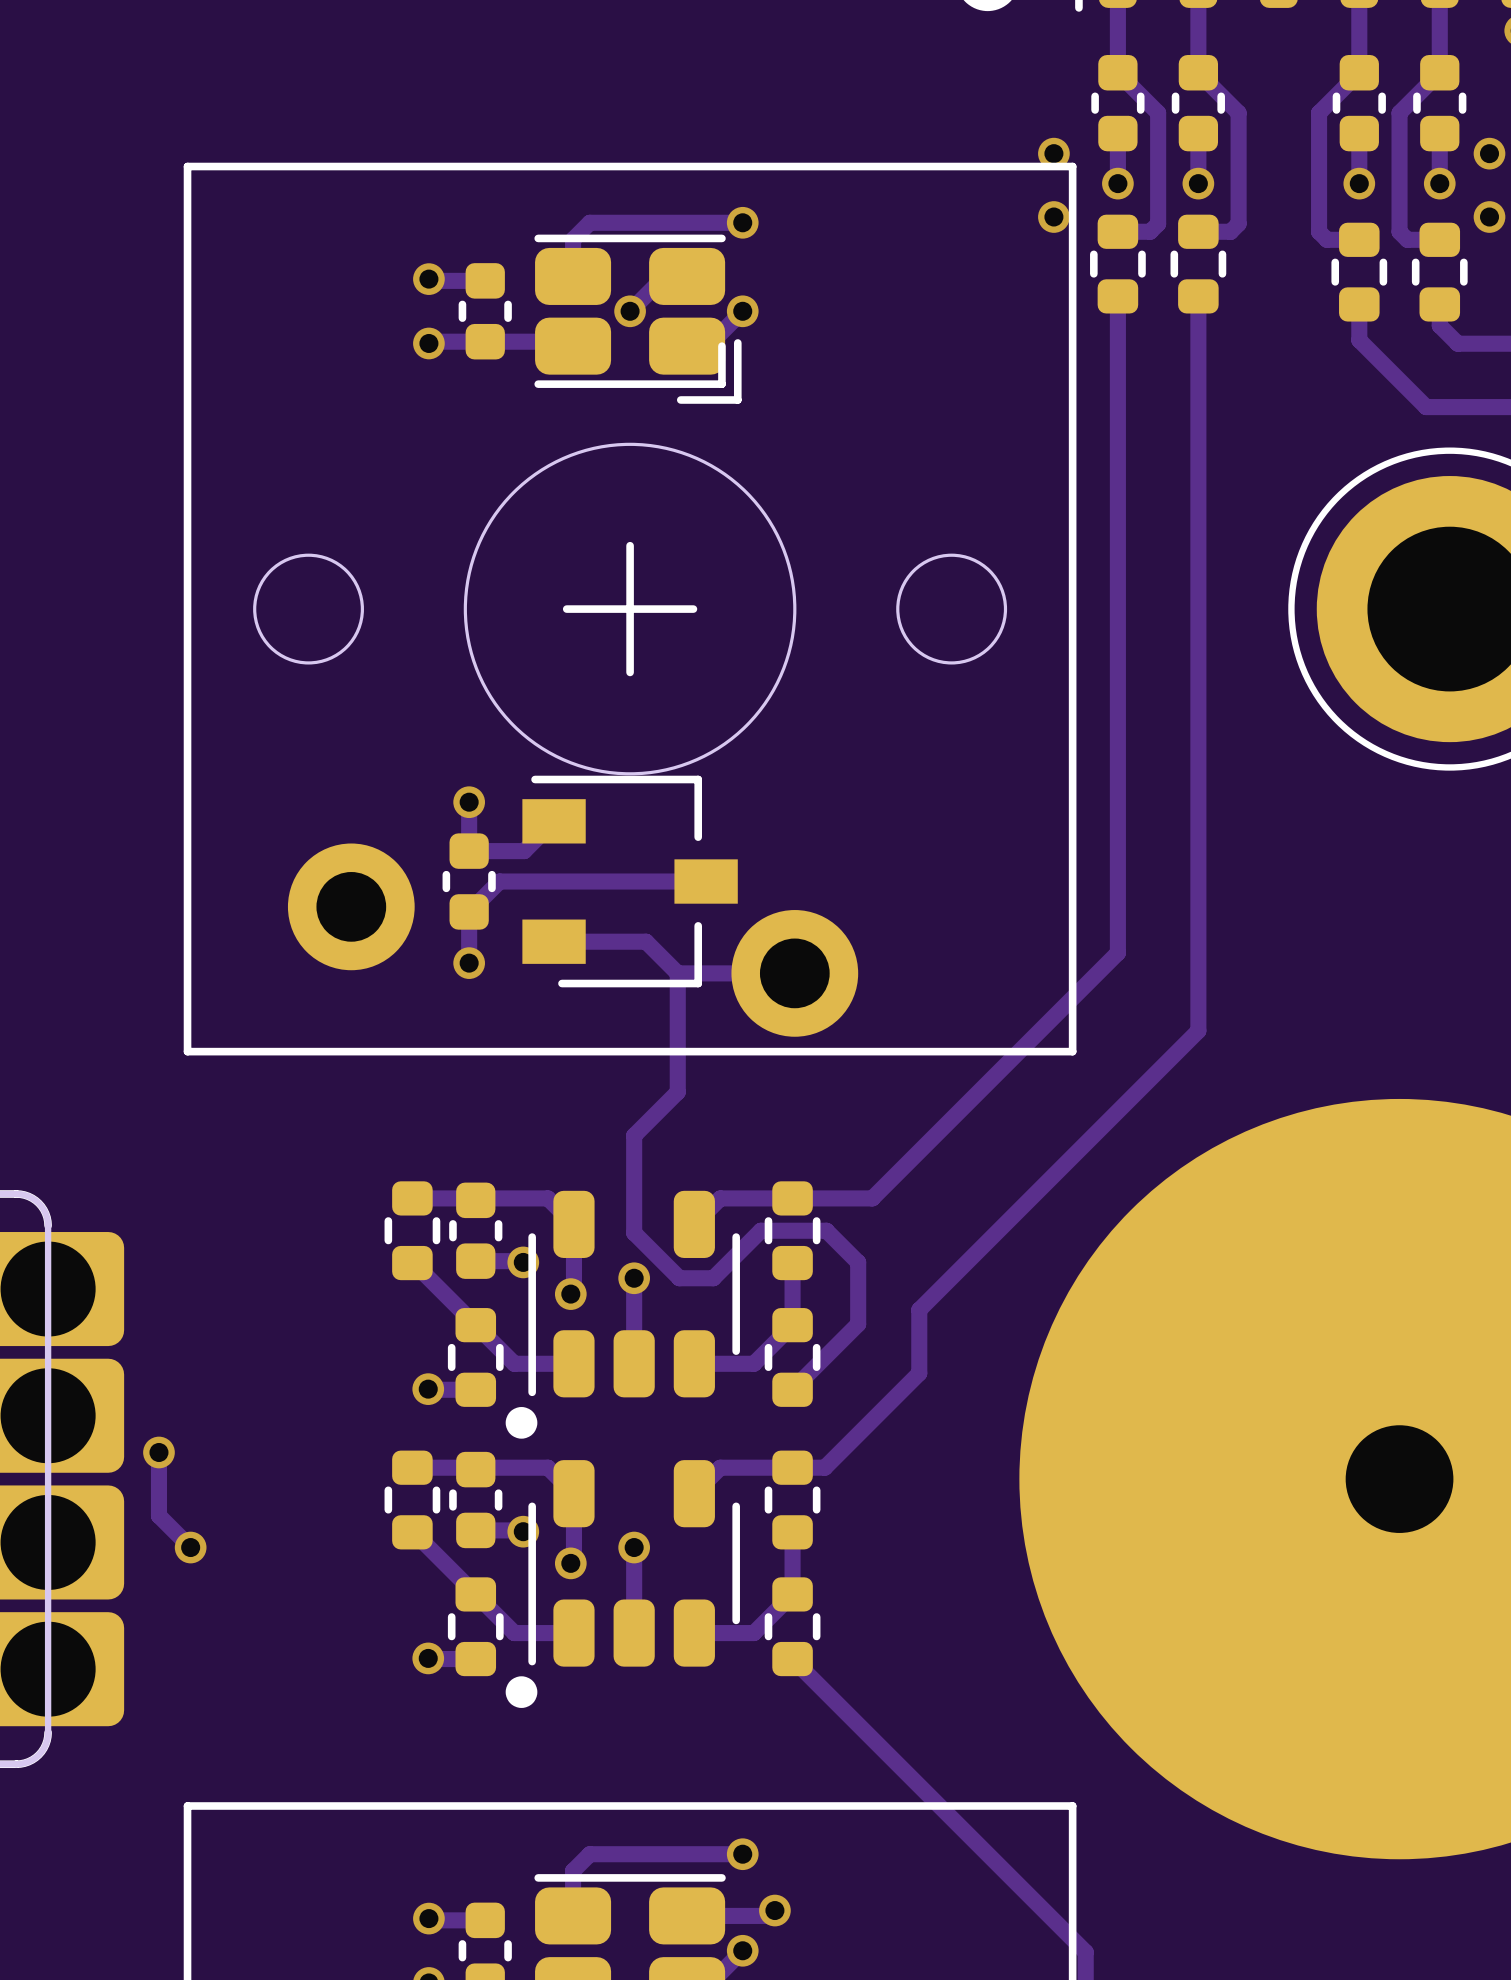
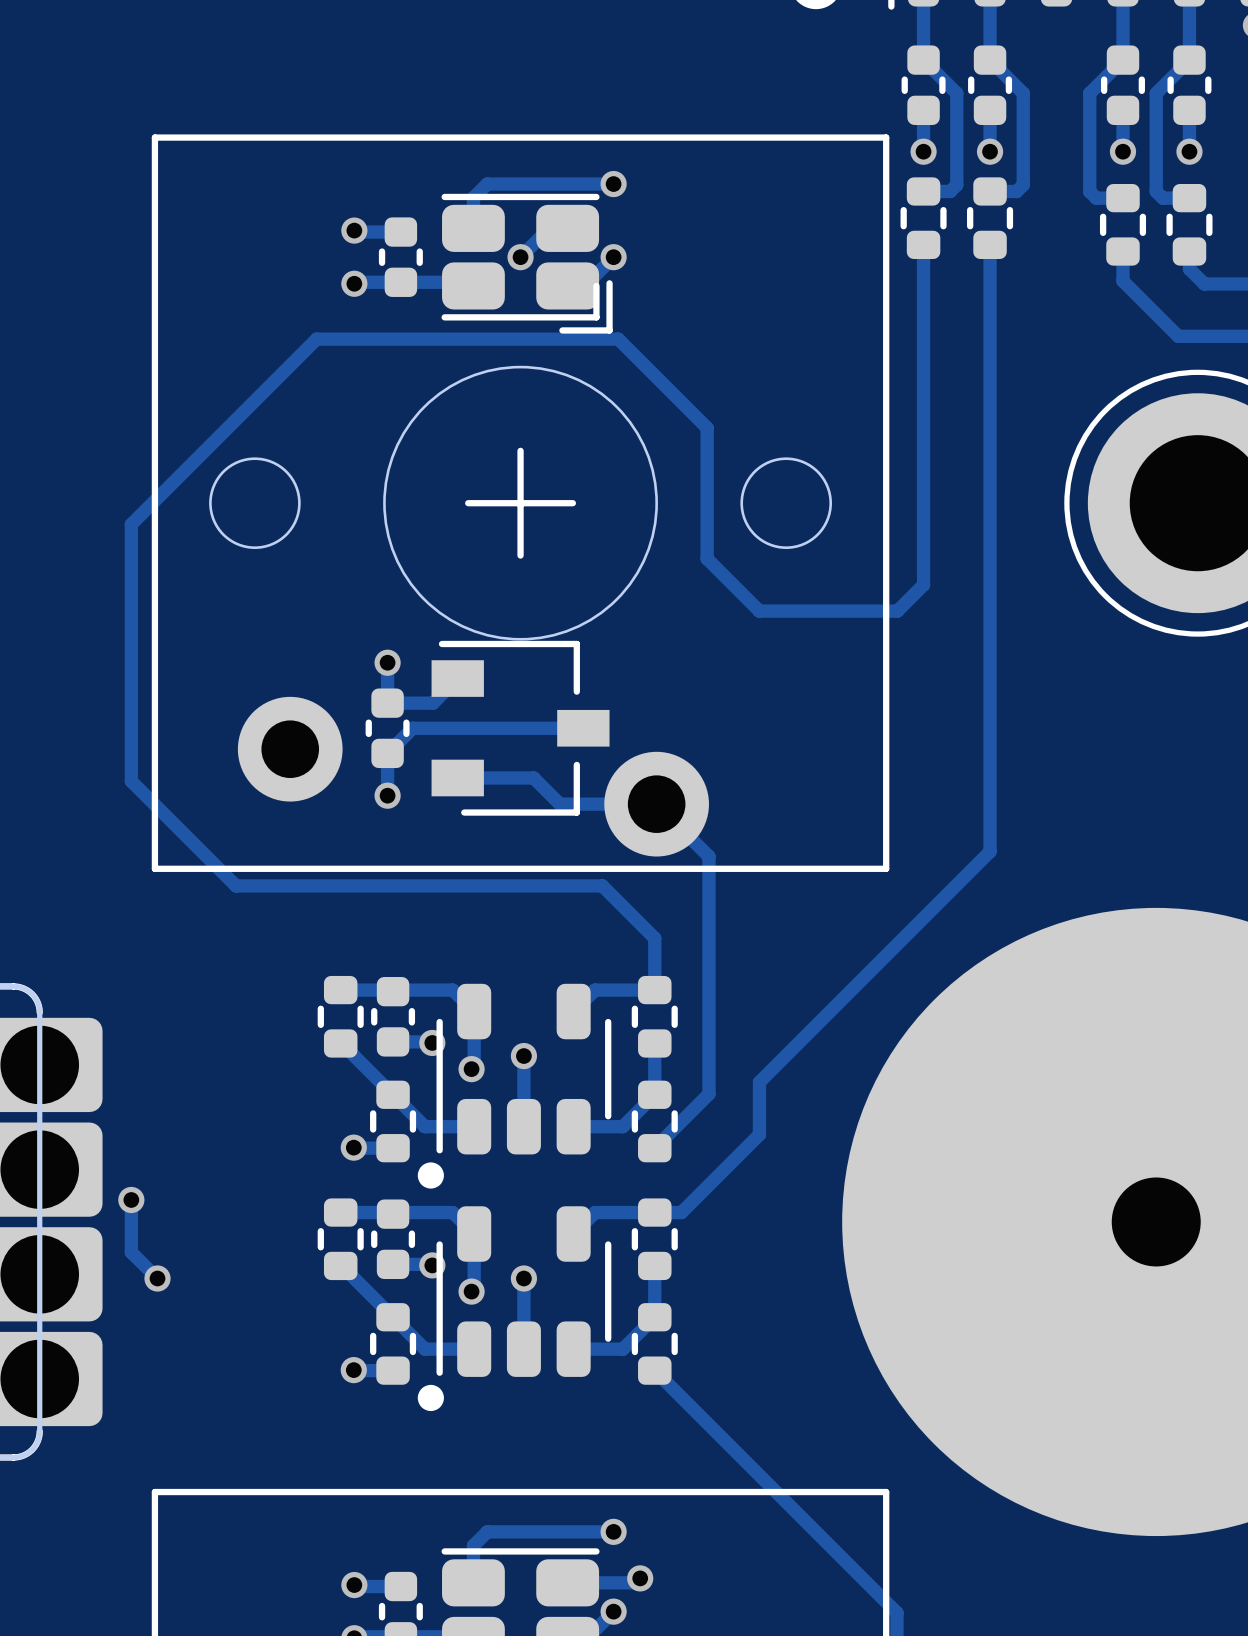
via: (1053, 153) -> none
via: (1489, 153) -> none
via: (1053, 217) -> none
via: (1489, 217) -> none
track: (1117, 708) (1117, 952) (872, 1198) (792, 1198) -> (923, 584) (897, 611) (759, 611) (707, 558) (707, 427) (618, 339) (316, 339) (131, 524) (131, 781) (236, 885) (602, 885) (654, 938) (654, 990)
track: (677, 973) (677, 1092) (634, 1135) (634, 1232) (679, 1278) (713, 1278) (760, 1230) (826, 1230) (858, 1262) -> (656, 804) (708, 856) (708, 1042)

